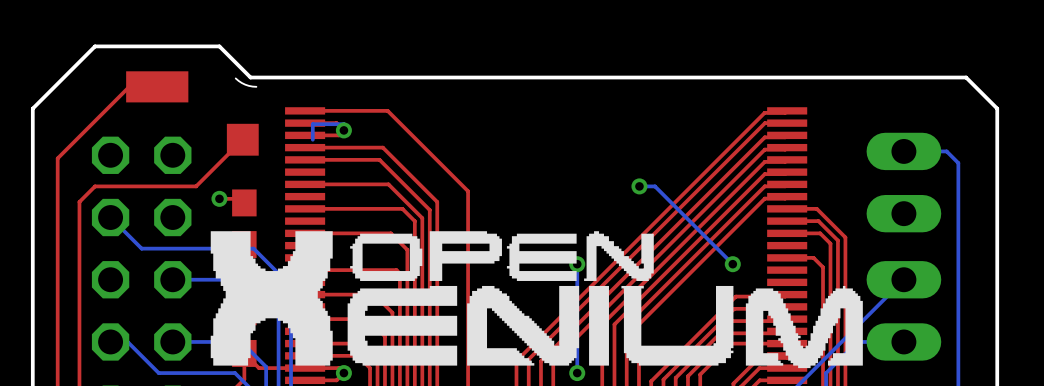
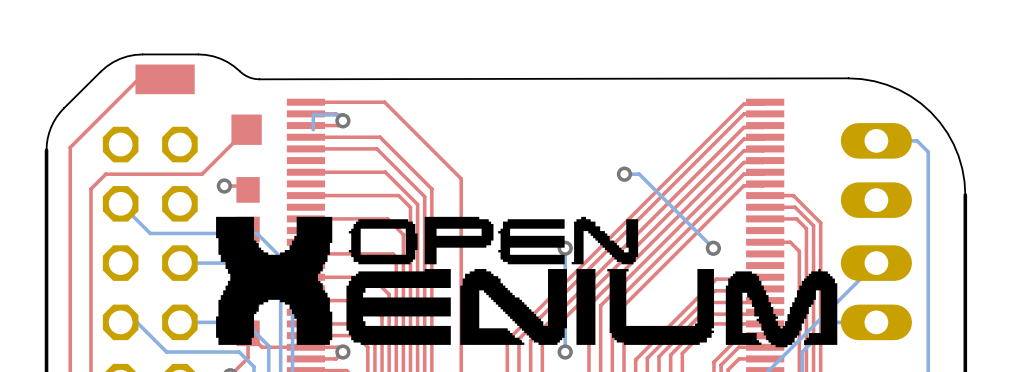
board edge: none -> (239, 71) (227, 62) (206, 54) (142, 54) (119, 58) (100, 71) (60, 112) (51, 127) (46, 150)
board edge: (32, 161) (32, 108) (95, 46) (219, 46) (250, 77) (966, 77) (997, 108) (997, 208) -> (259, 79) (861, 79) (887, 84) (910, 96) (939, 122) (958, 156) (965, 195)

